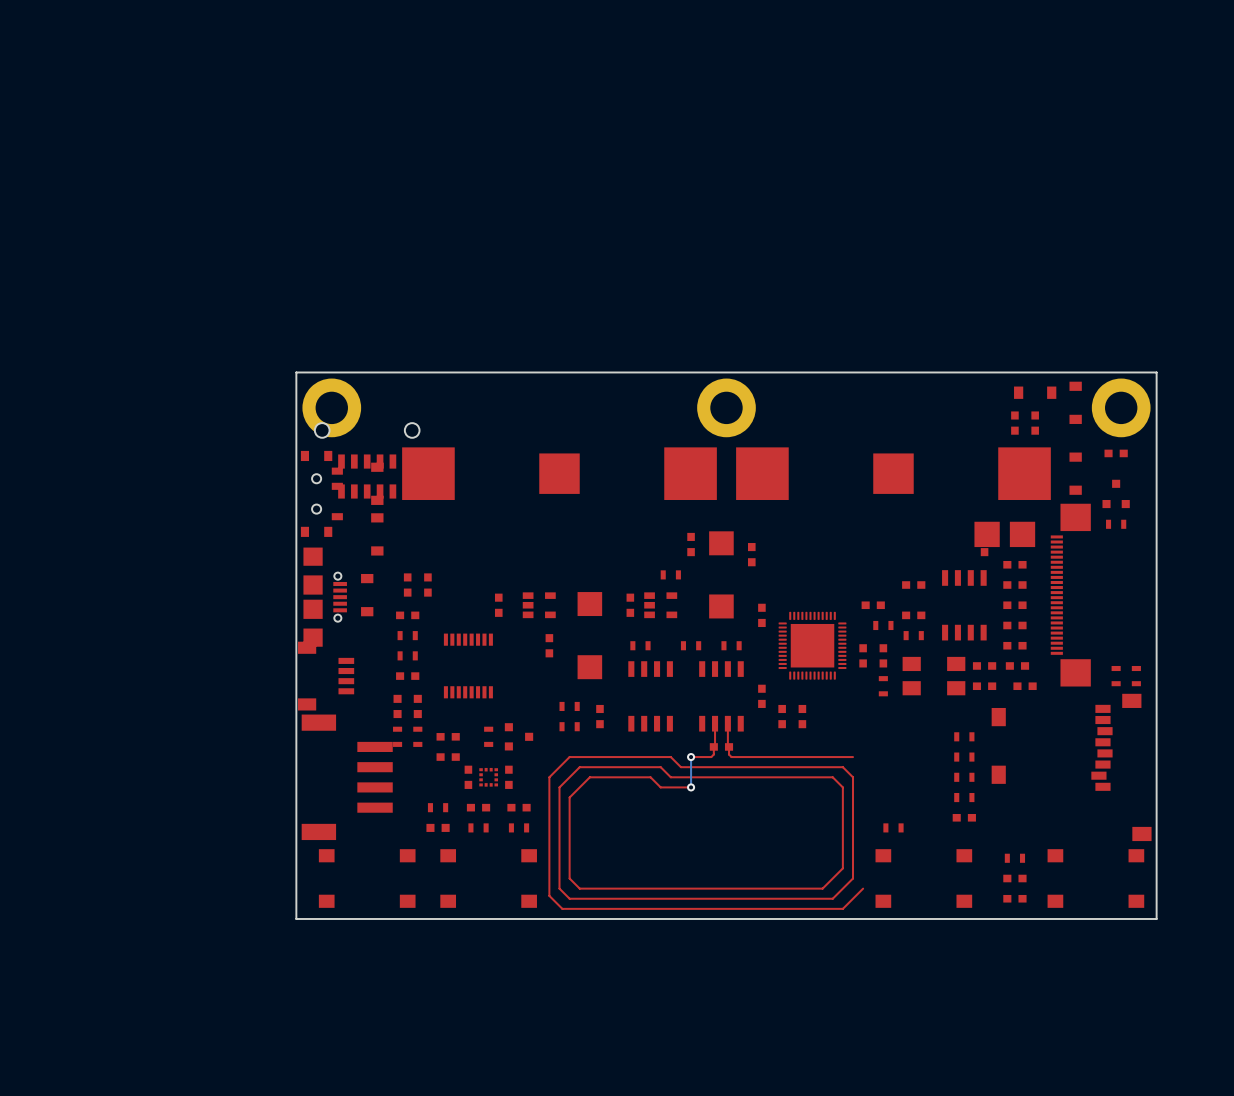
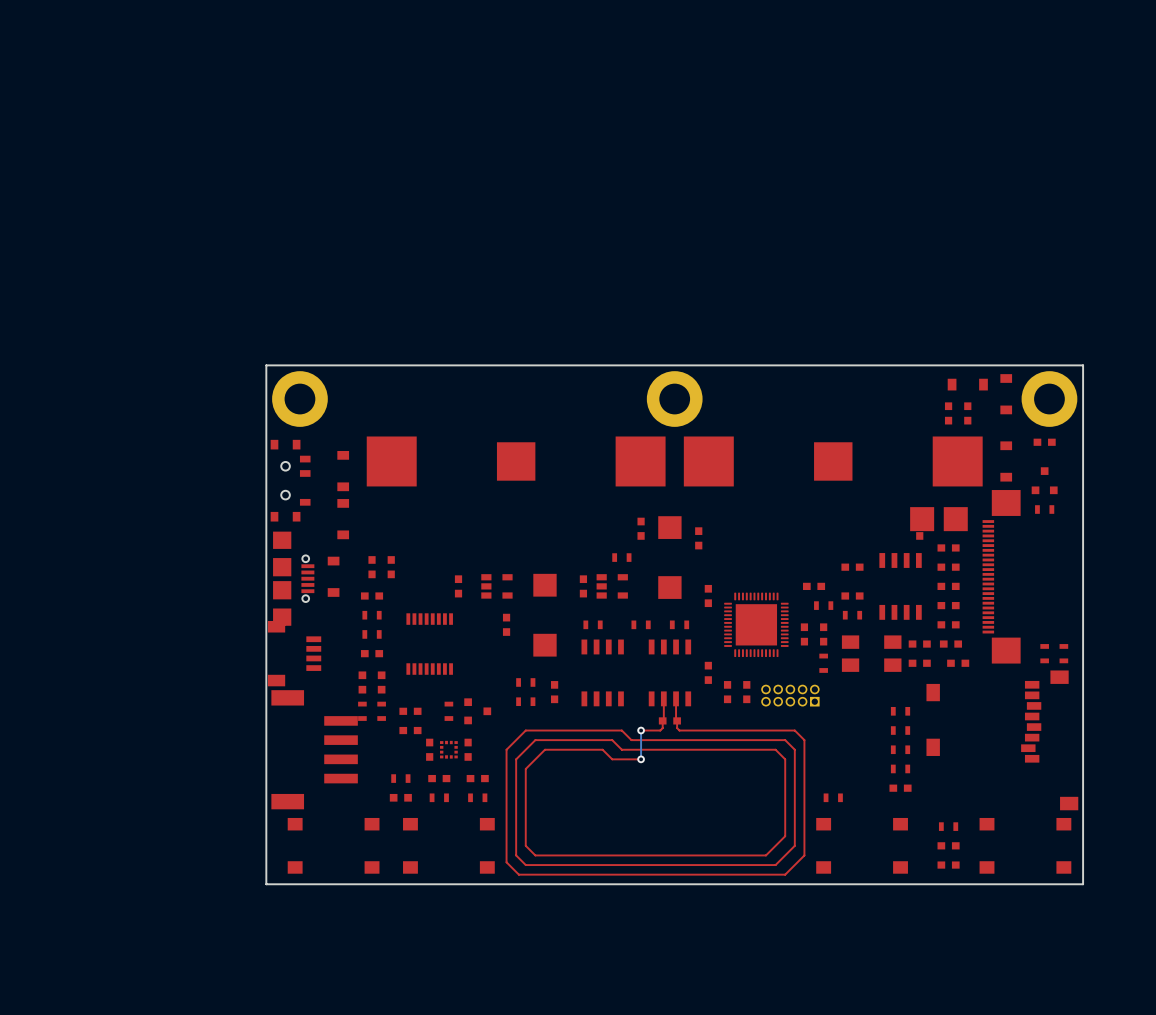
part: (367, 460) -> none
part: none -> (790, 695)
top track: none -> (794, 730) (804, 740) (804, 855)

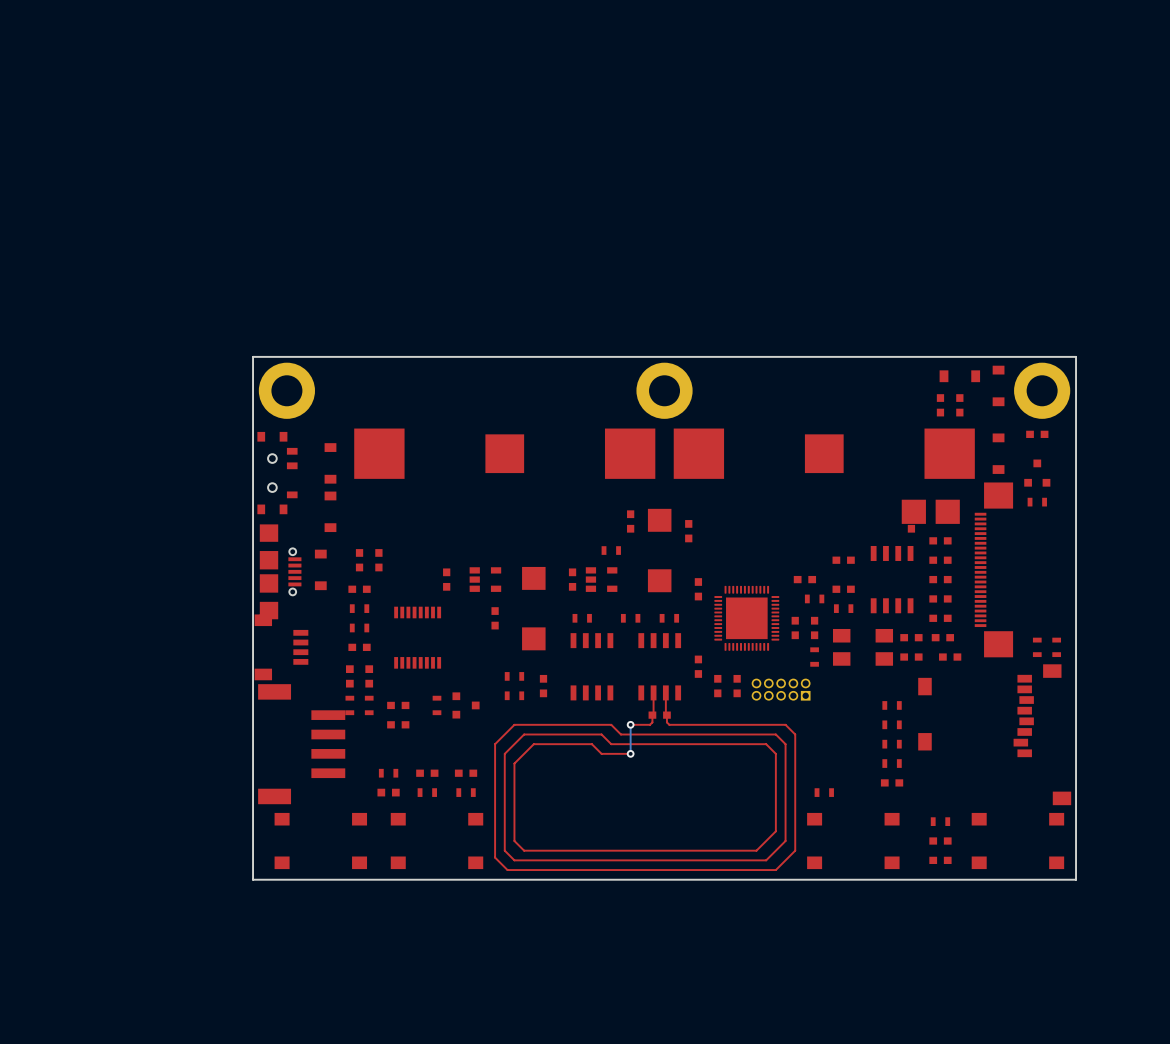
part: (429, 749) -> none
part: (448, 749) -> none
part: (468, 749) -> none

